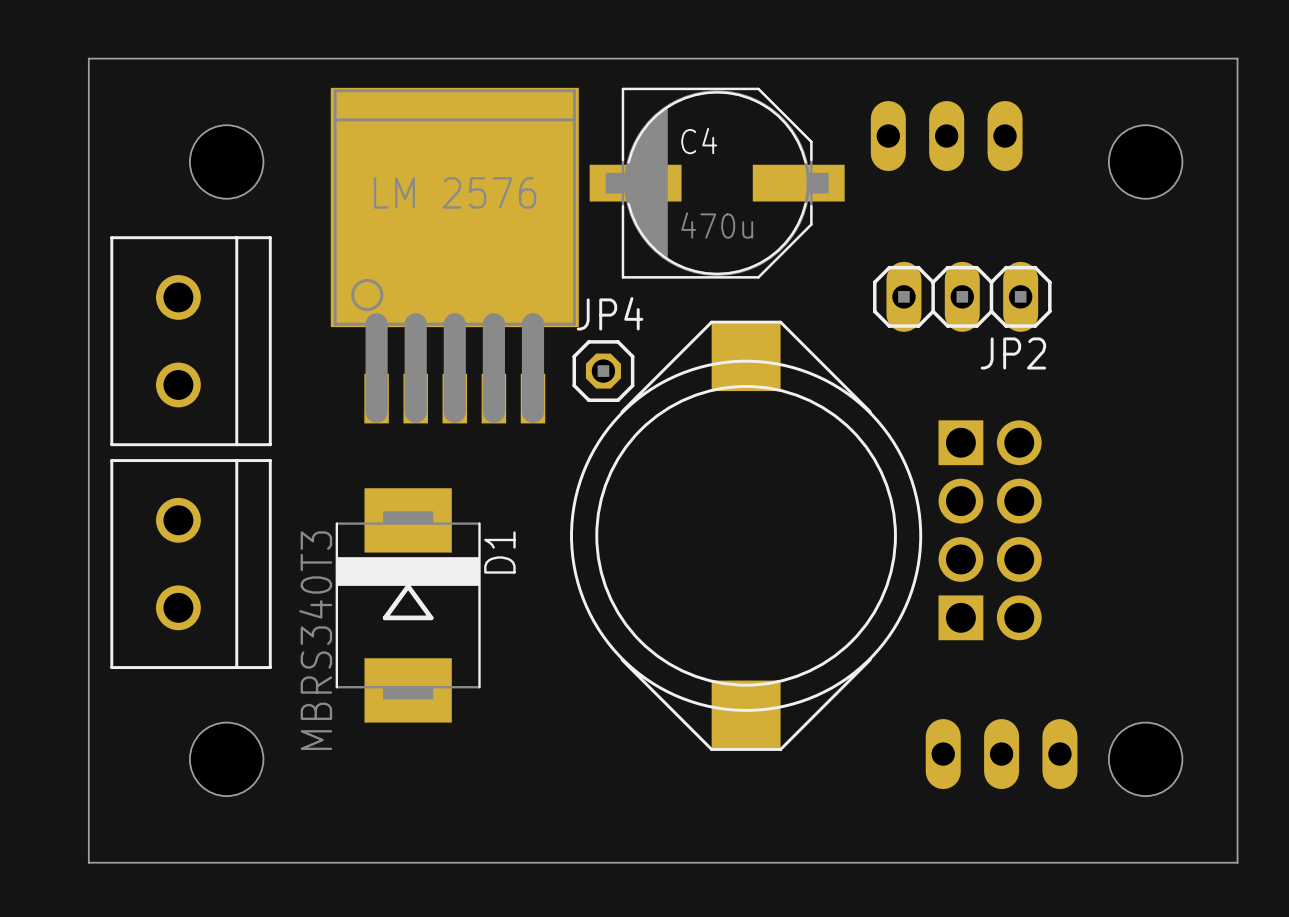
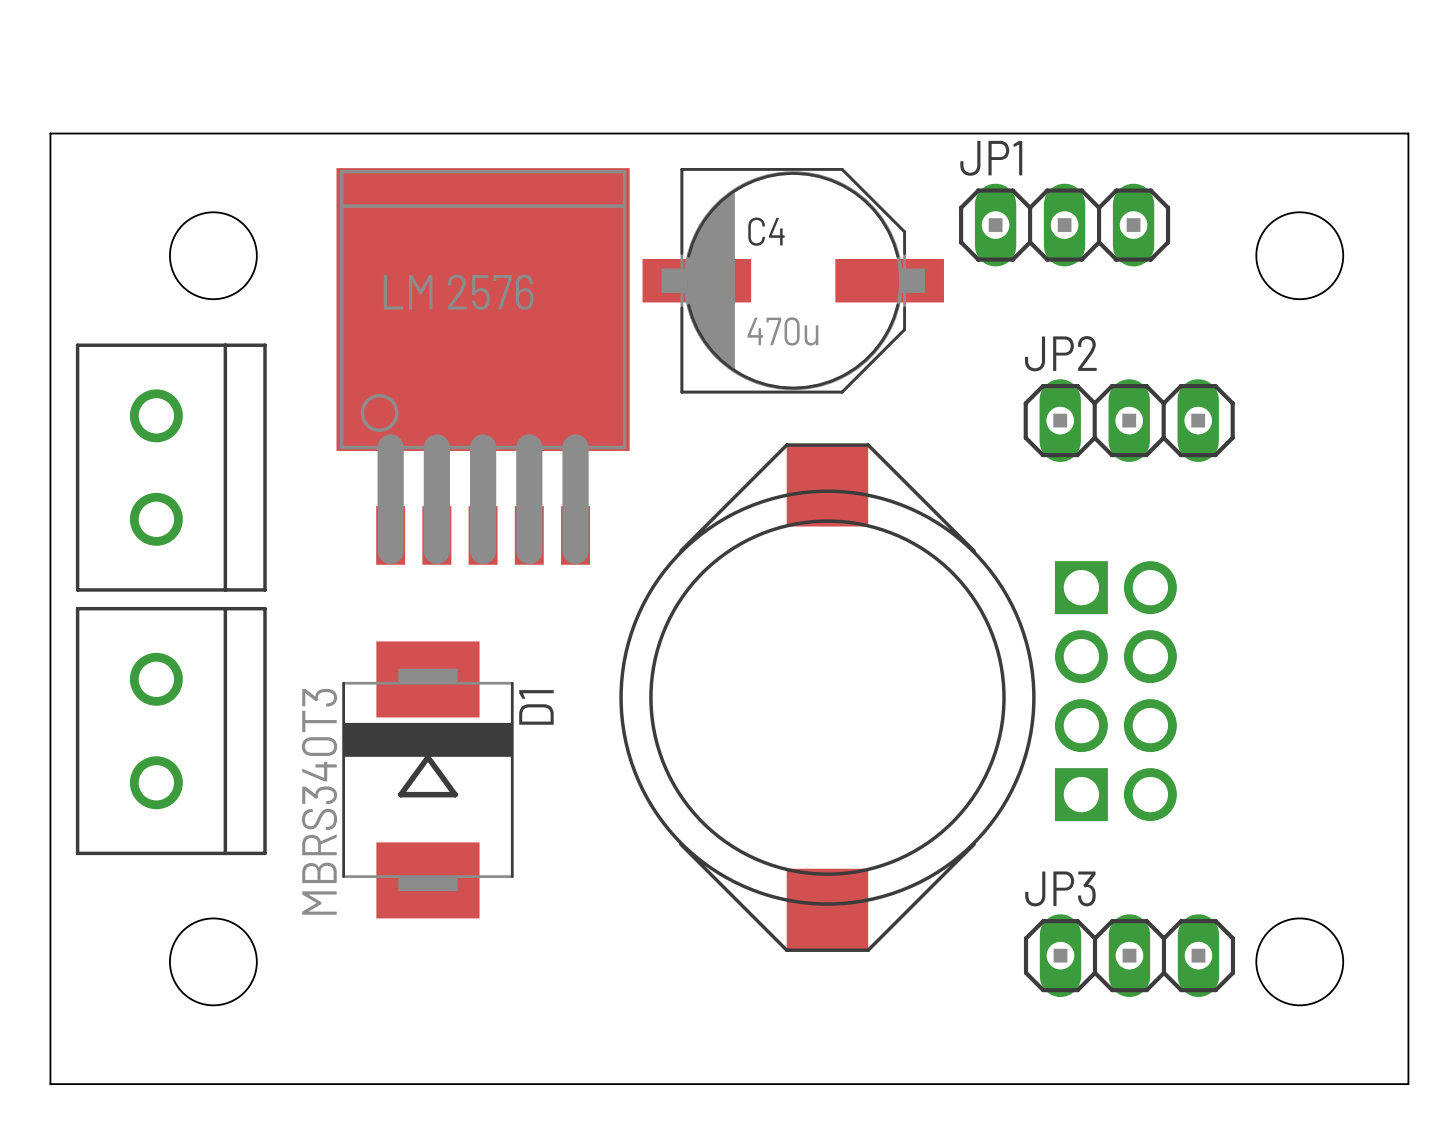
JP1 side: bottom (946, 136) -> top (1064, 225)
JP2 position: (962, 296) -> (1129, 420)
JP2 name position: JP2 (1013, 353) -> JP2 (1060, 353)
JP4: (603, 371) -> none
JP3 side: bottom (1001, 754) -> top (1129, 955)

